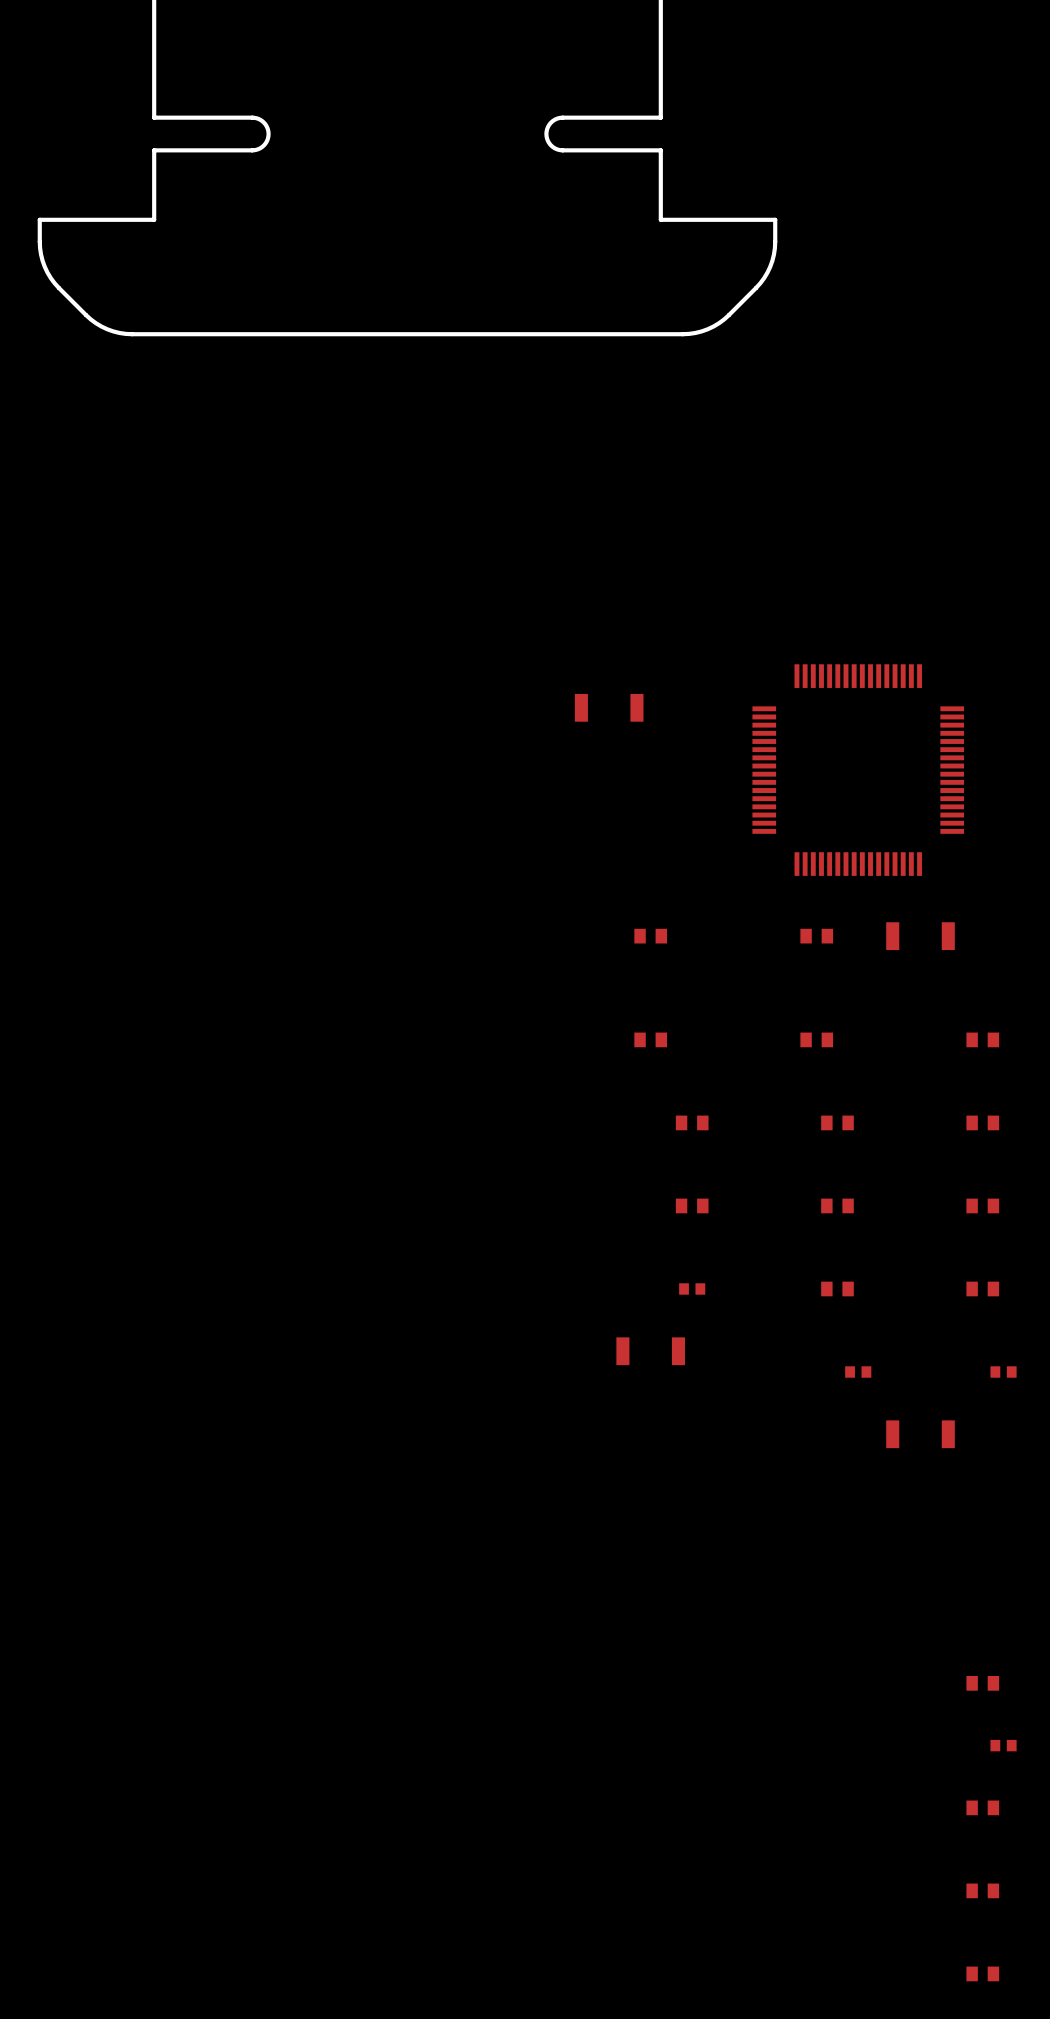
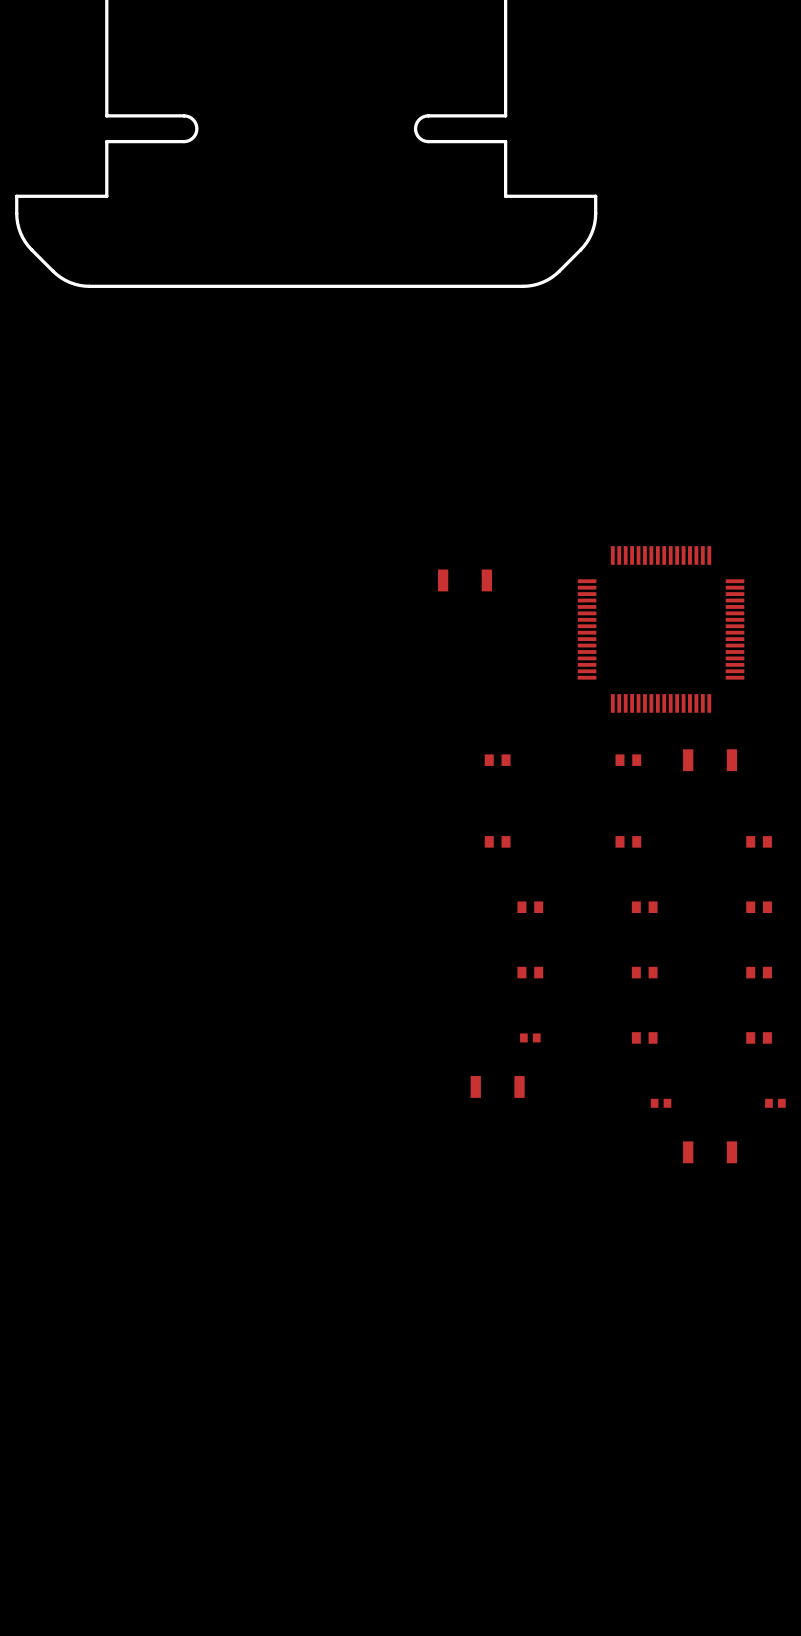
part: (982, 1683) -> none
part: (1003, 1745) -> none
part: (982, 1807) -> none
part: (982, 1890) -> none
part: (982, 1973) -> none

